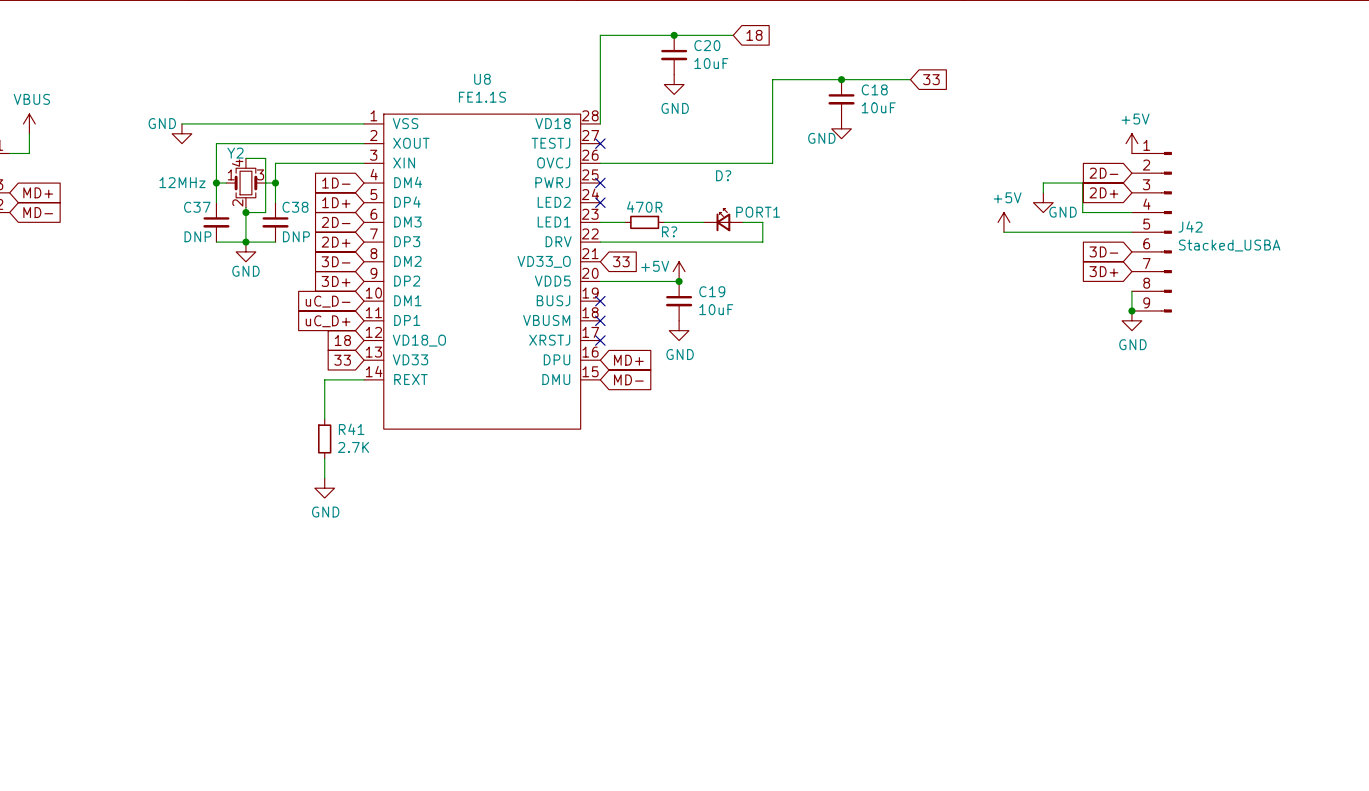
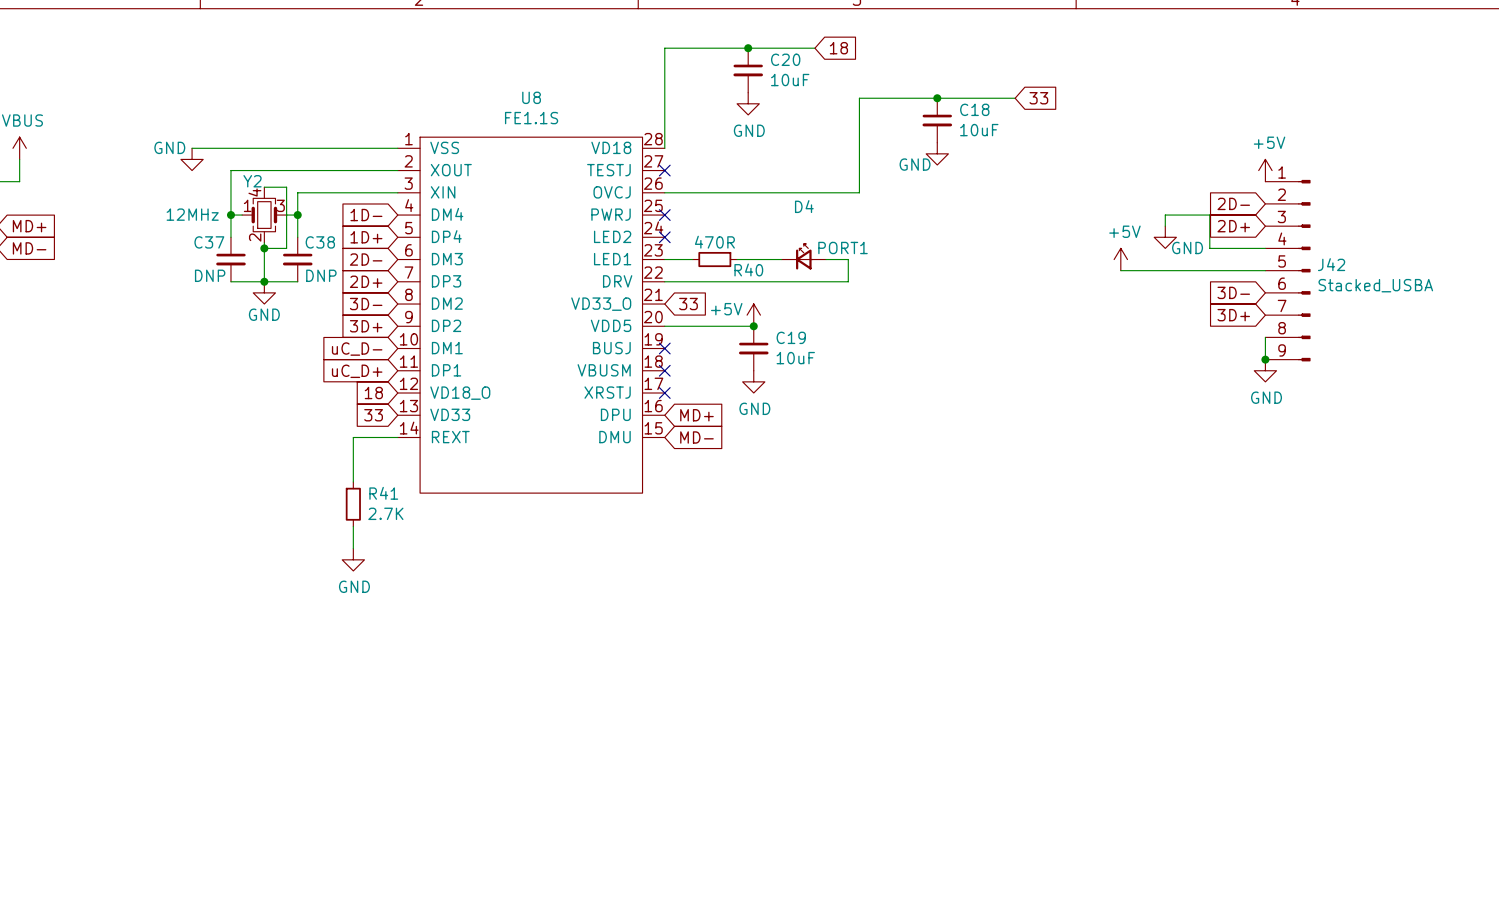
D? name: D? (723, 175) -> D4 (804, 206)
R? name: R? (669, 231) -> R40 (748, 269)

